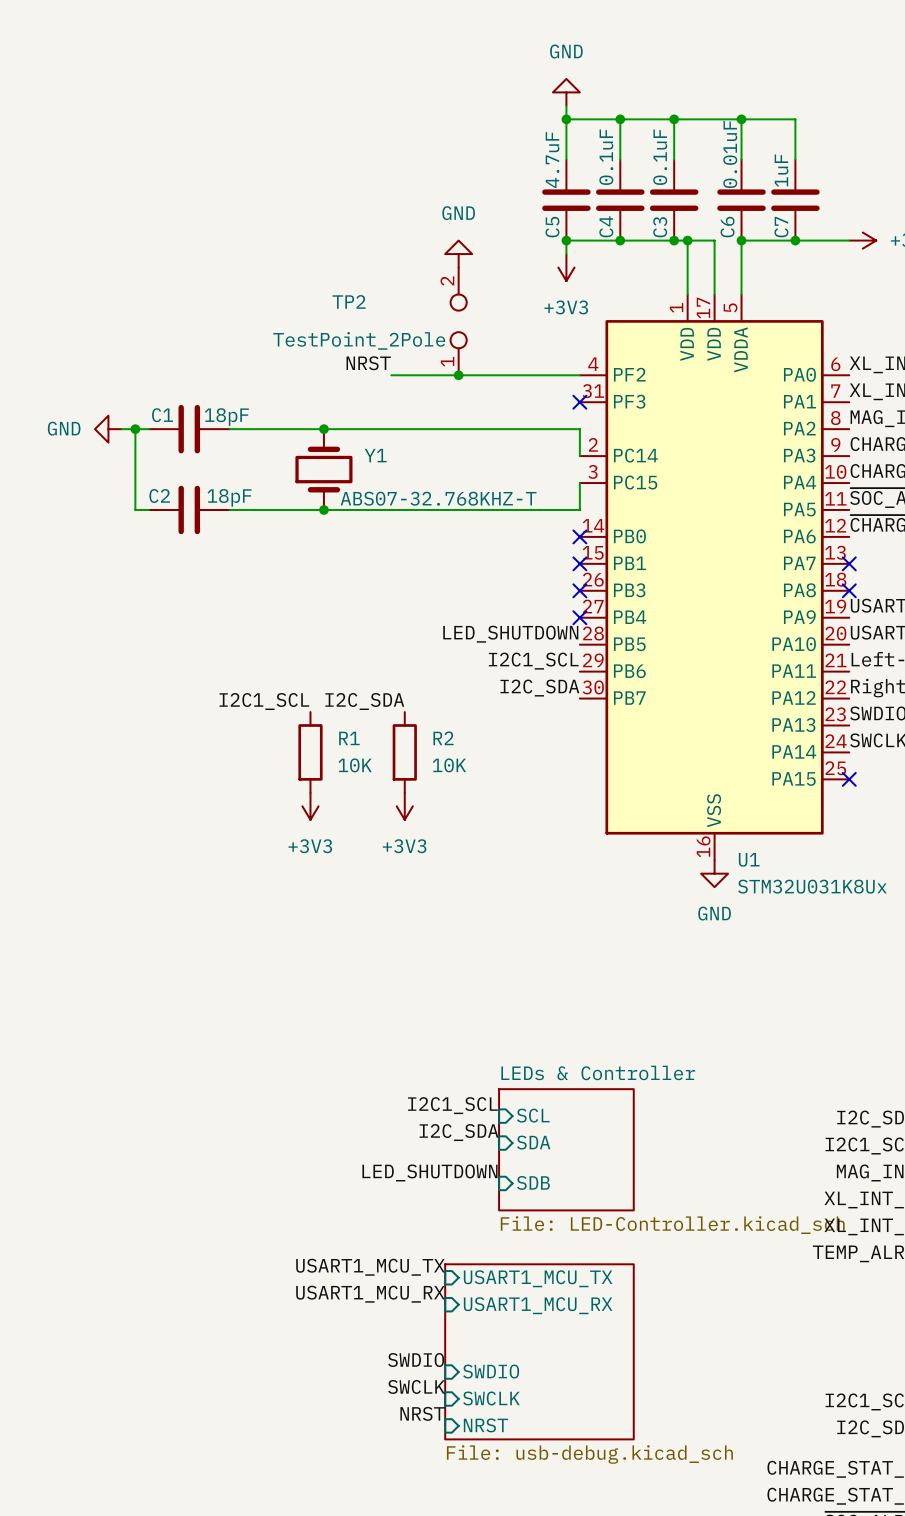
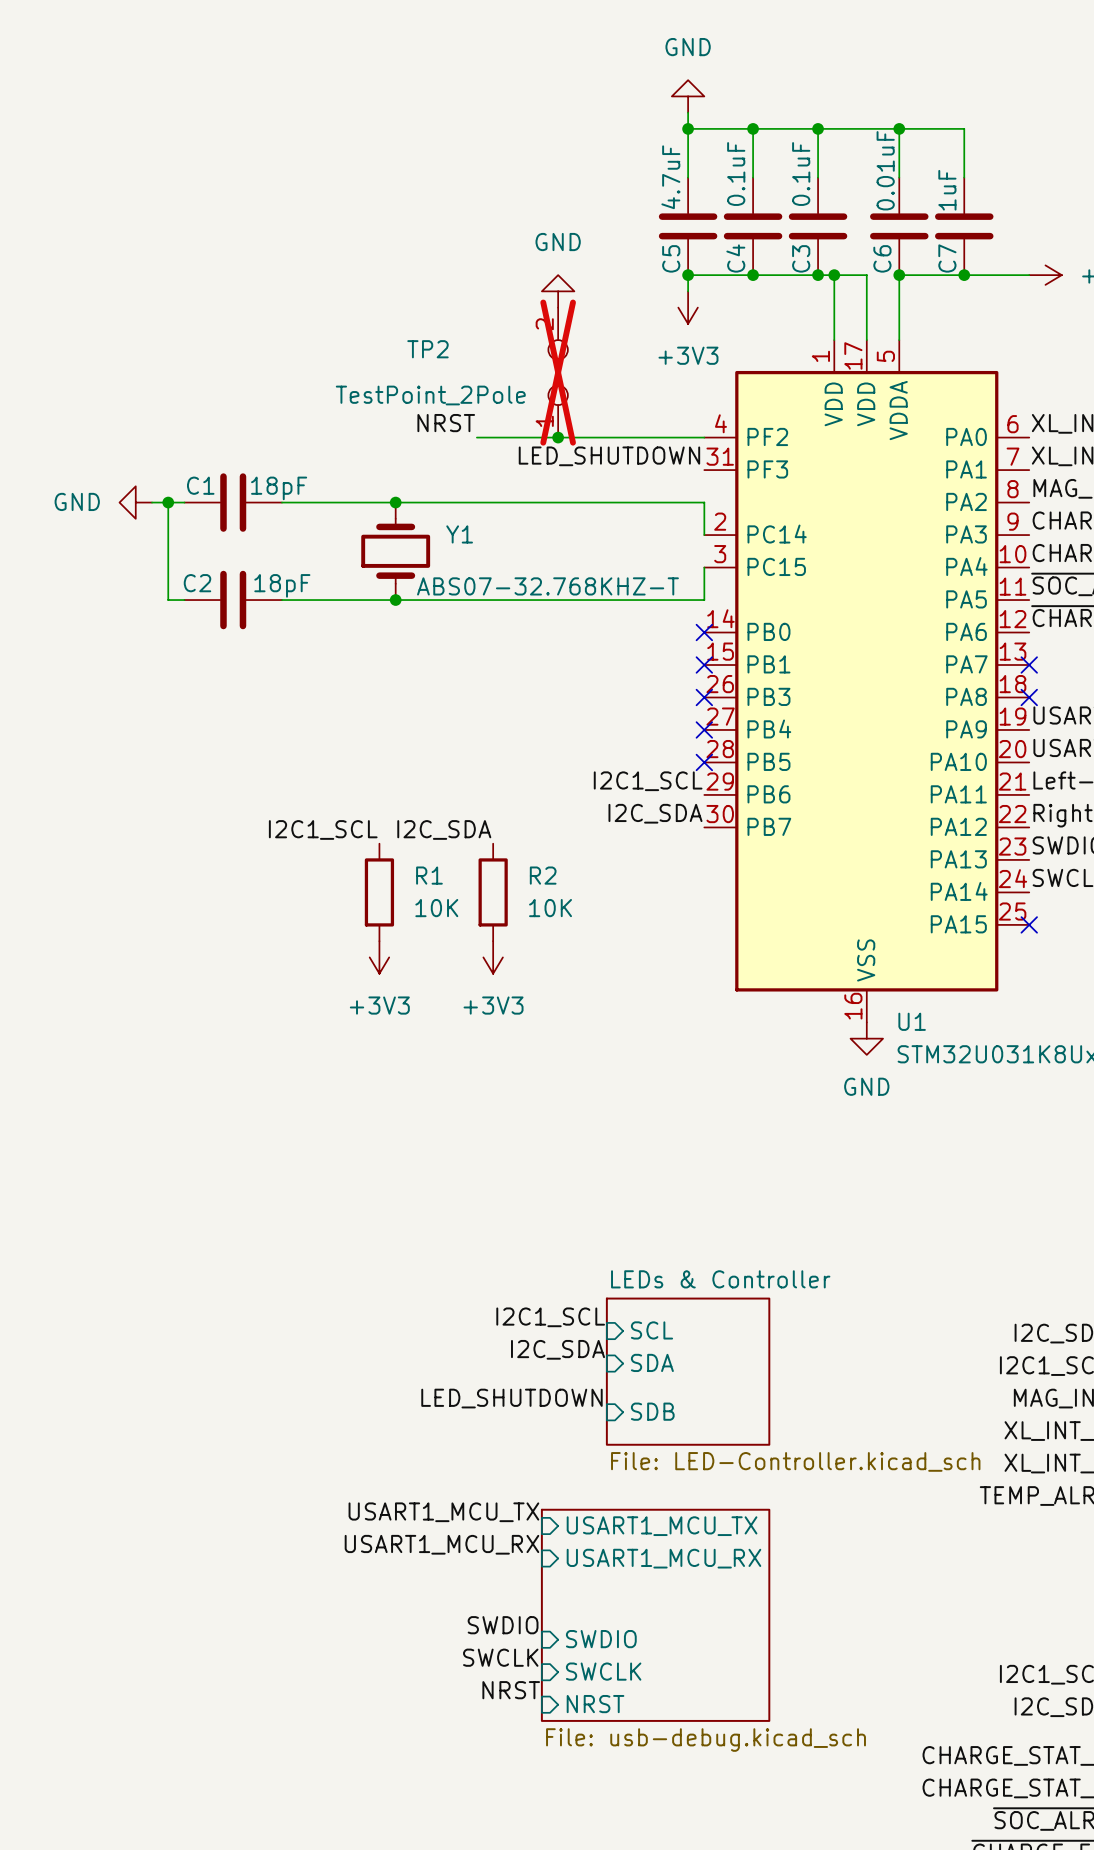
TP2 do-not-place cross: none -> (558, 372)
no-connect mark: (579, 402) -> none
label position: LED_SHUTDOWN (510, 634) -> LED_SHUTDOWN (609, 456)
no-connect mark: none -> (704, 762)

